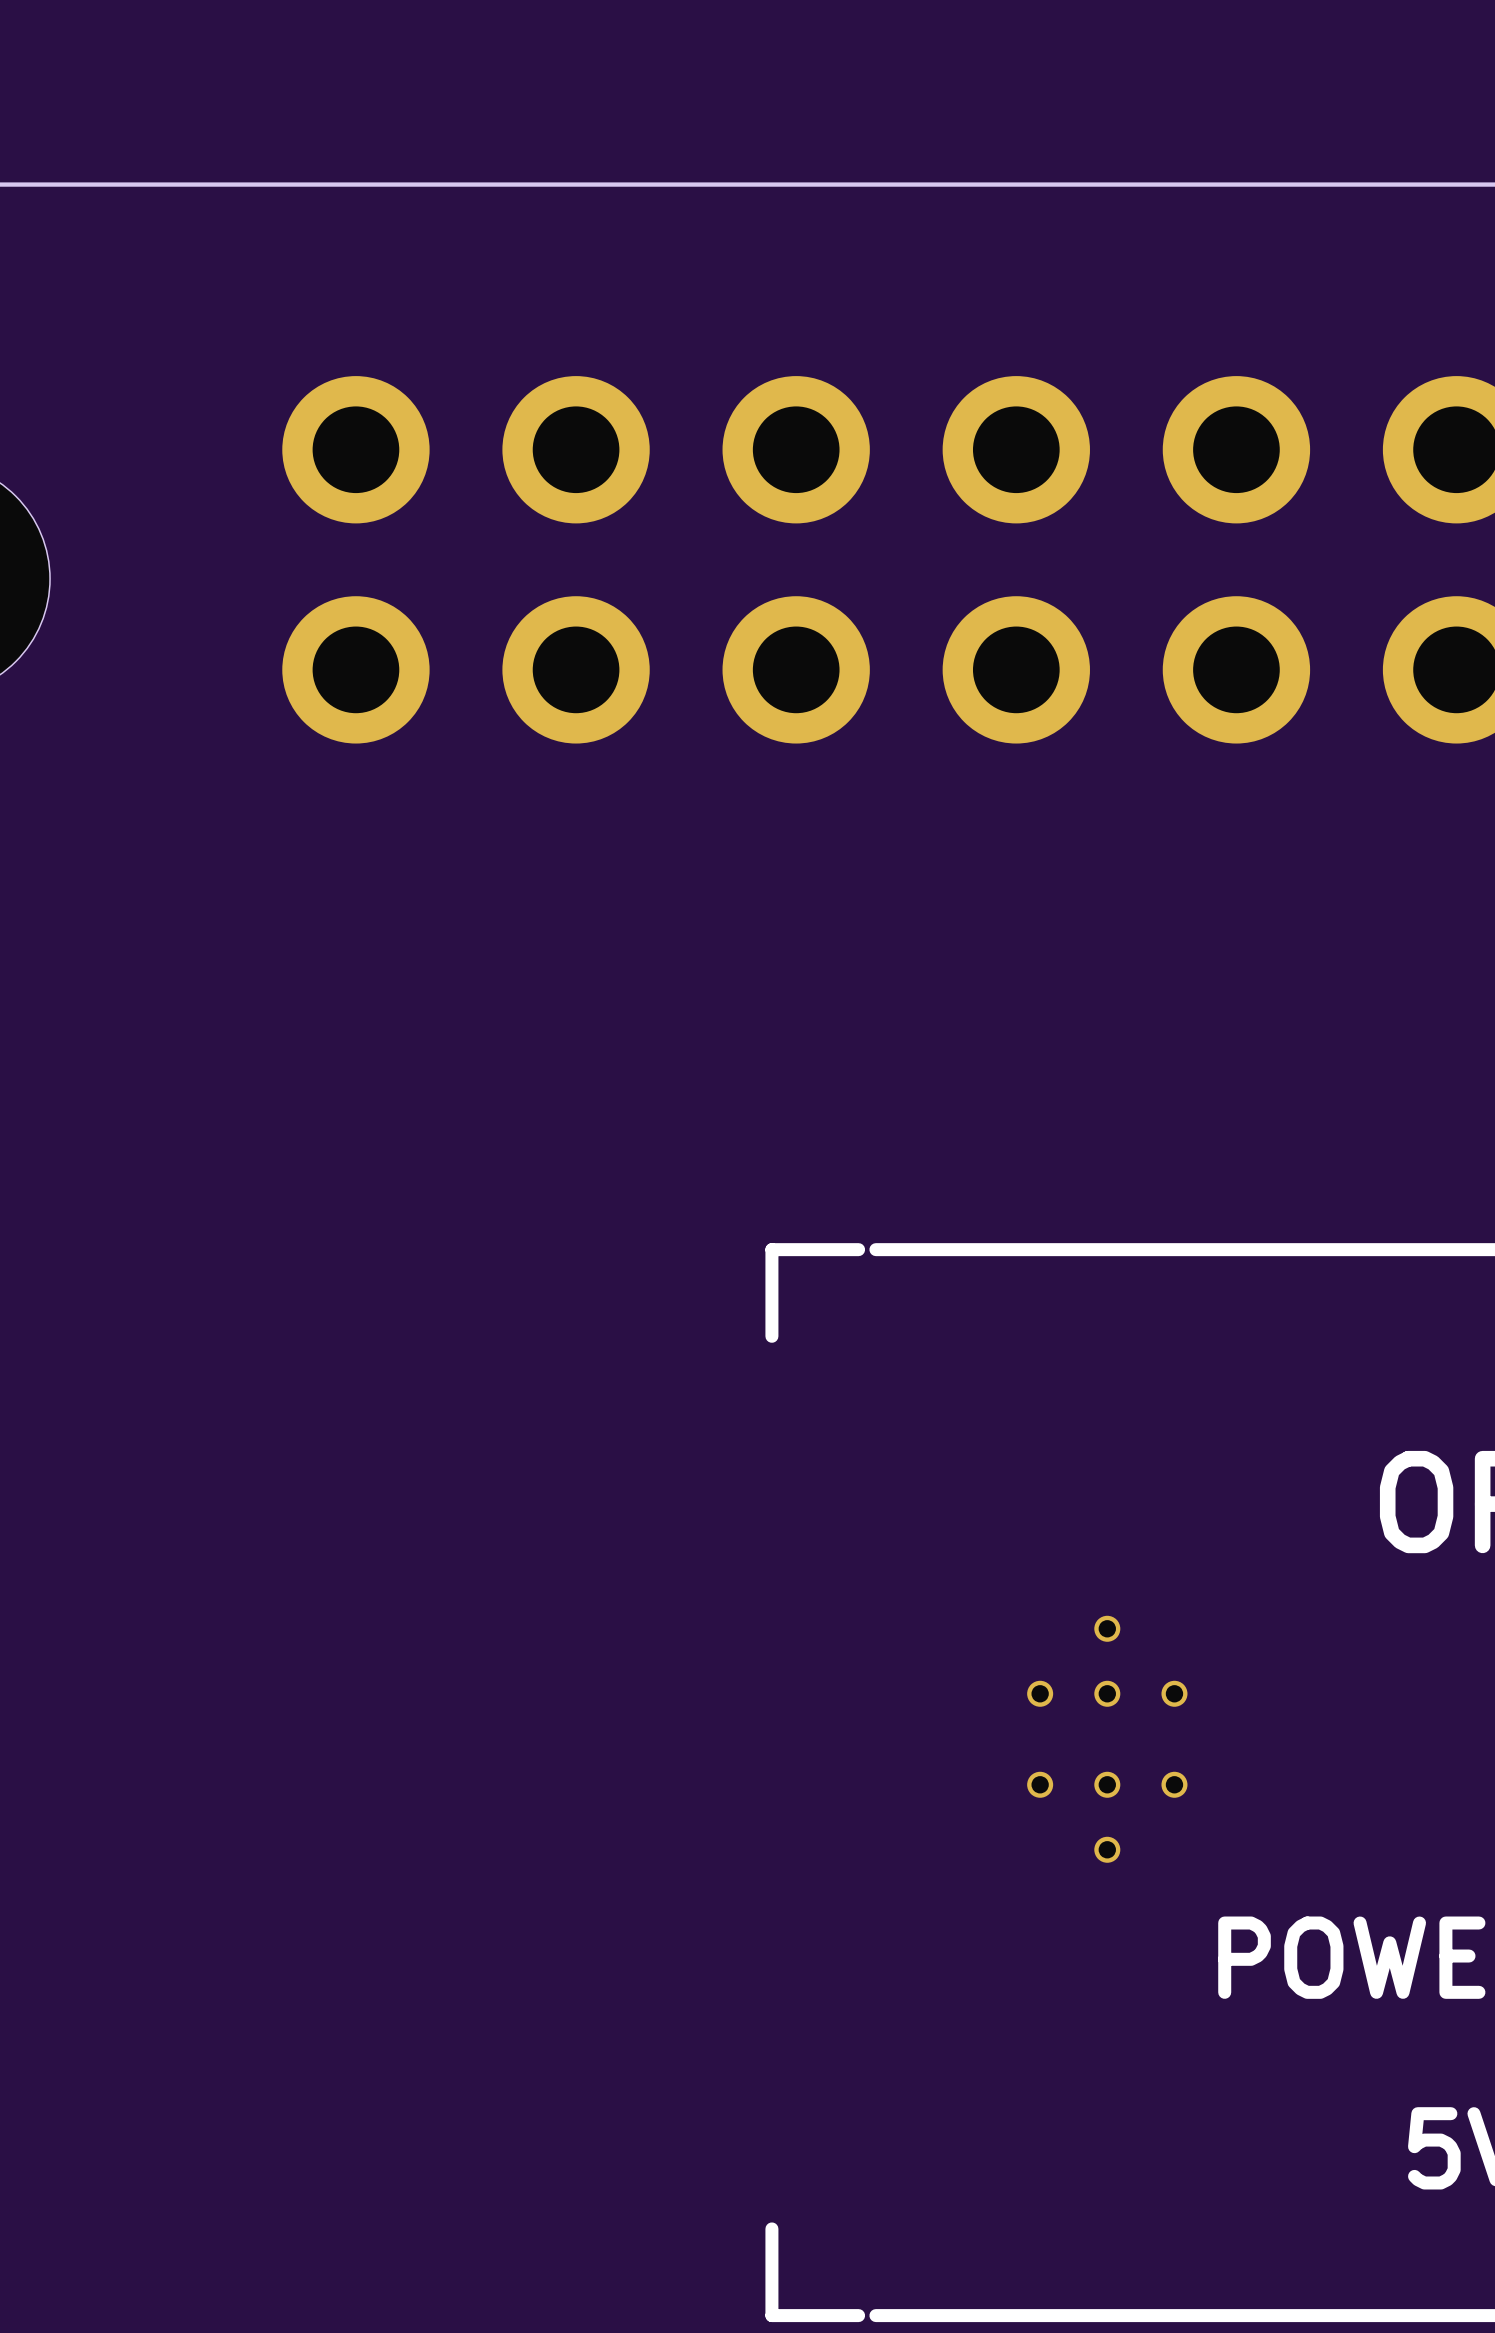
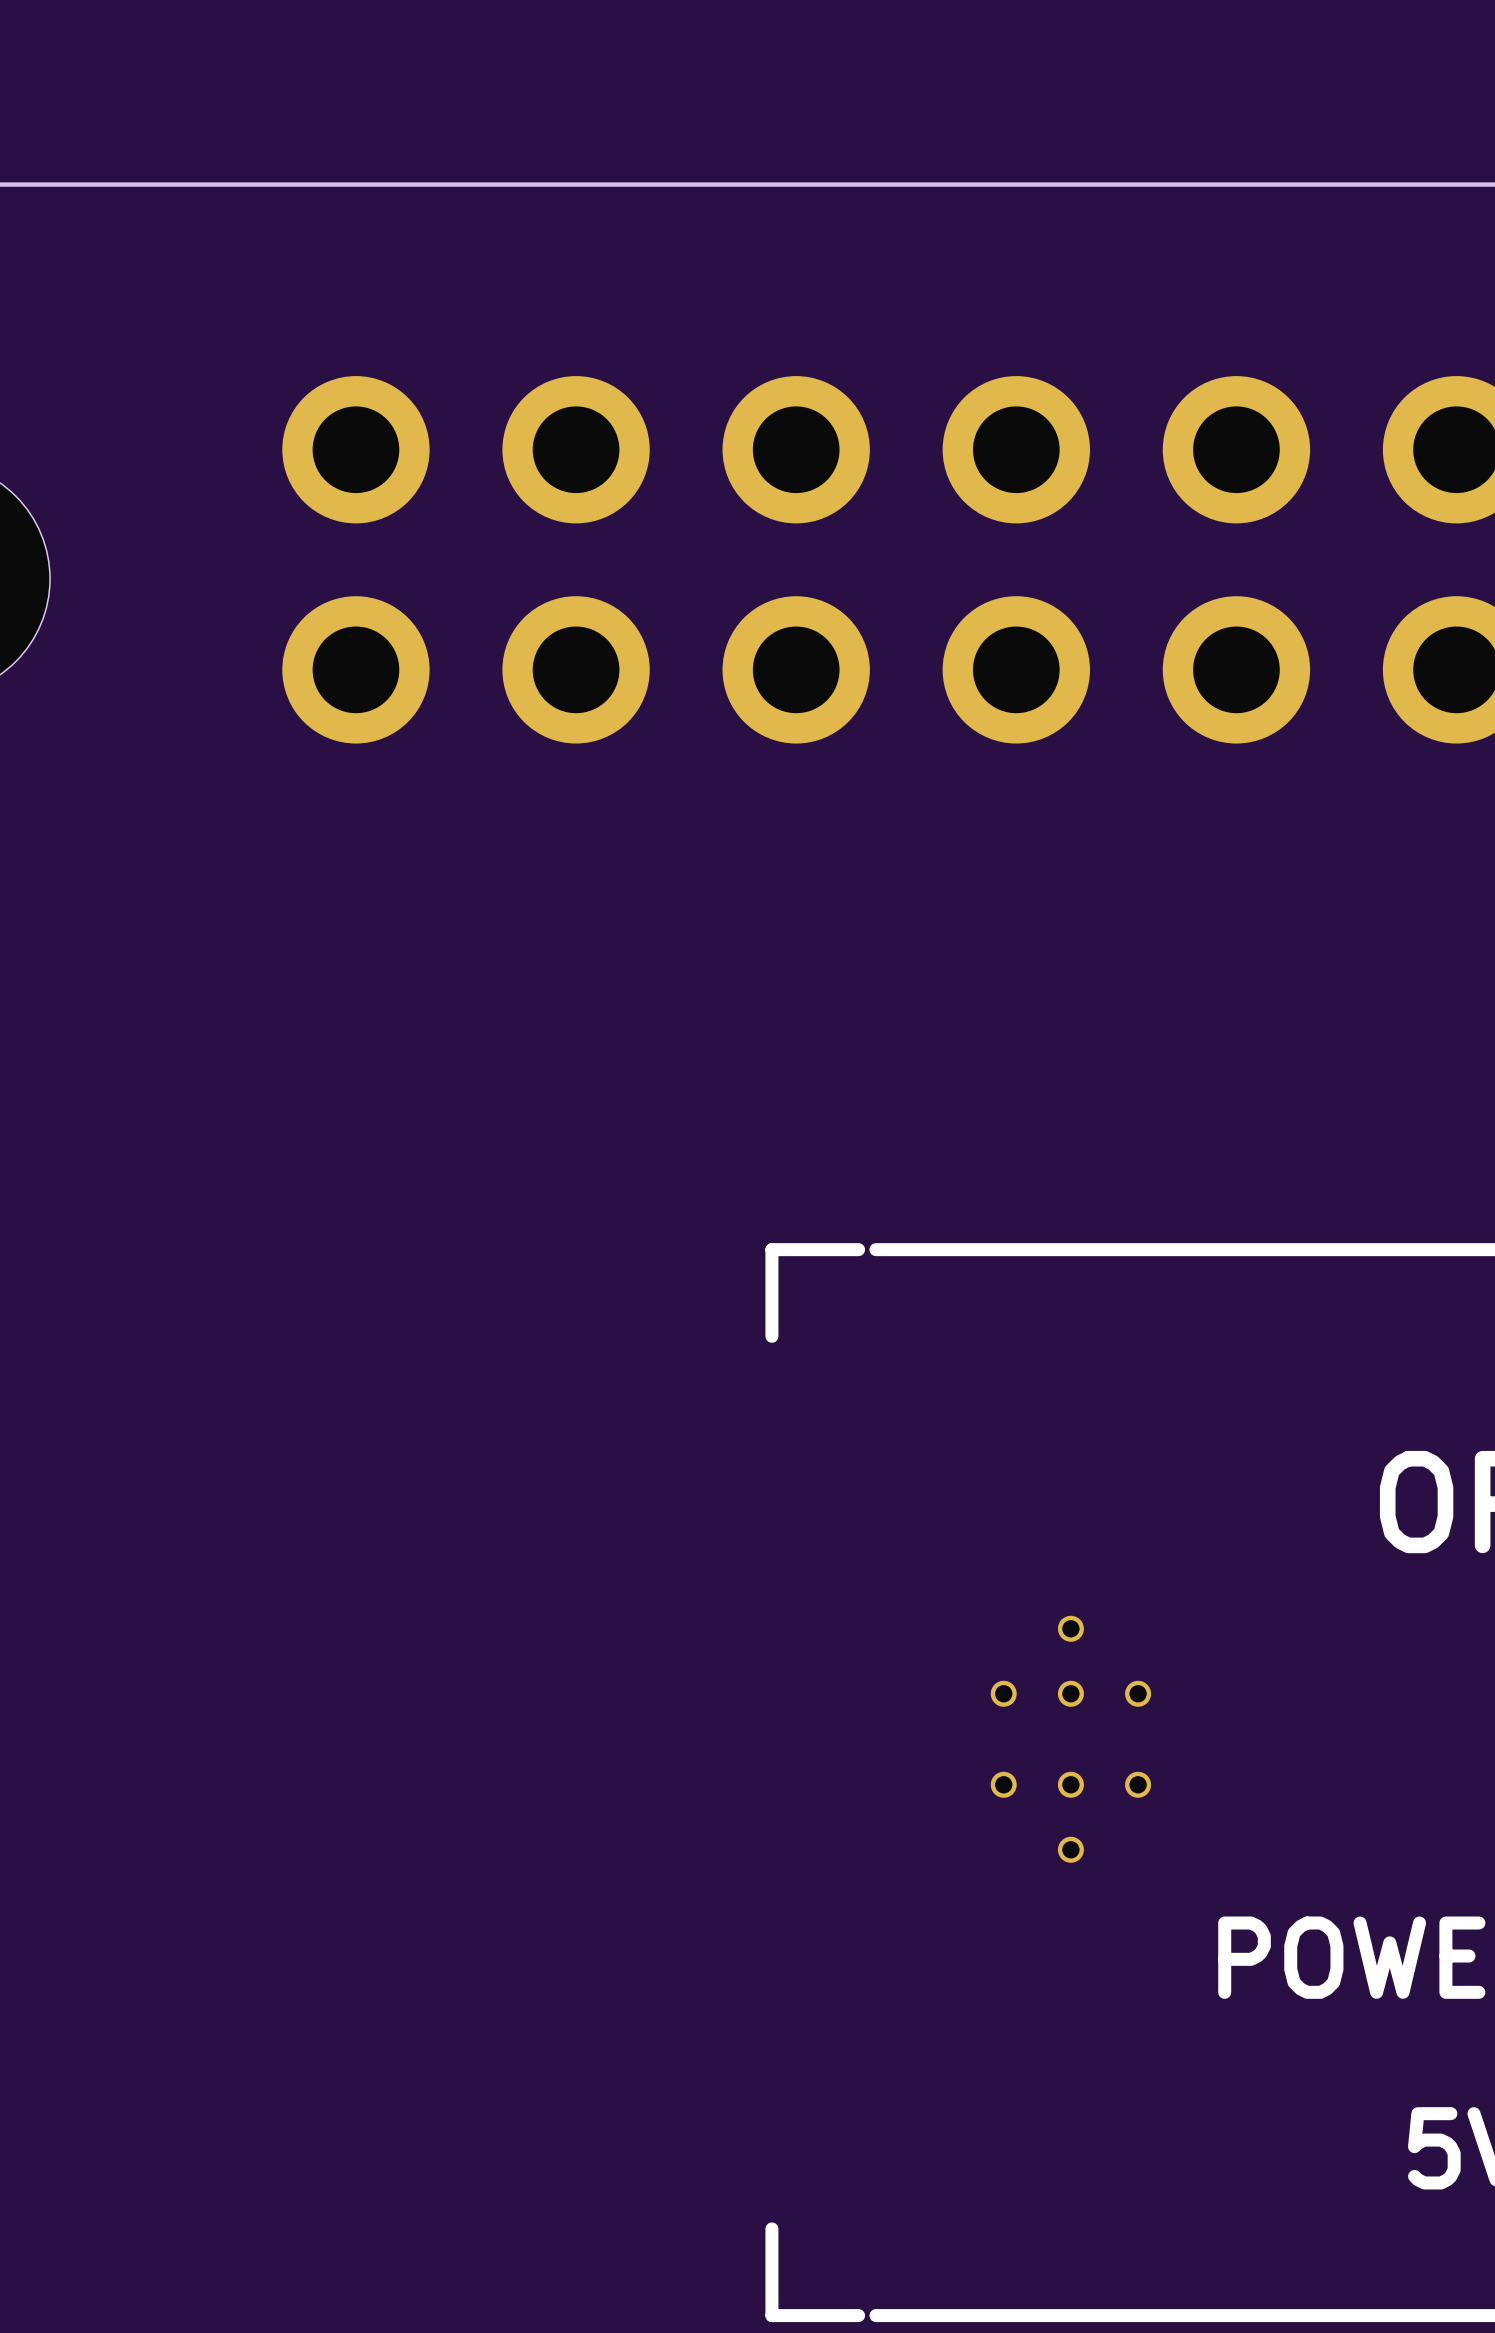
part position: (1107, 1739) -> (1070, 1739)

